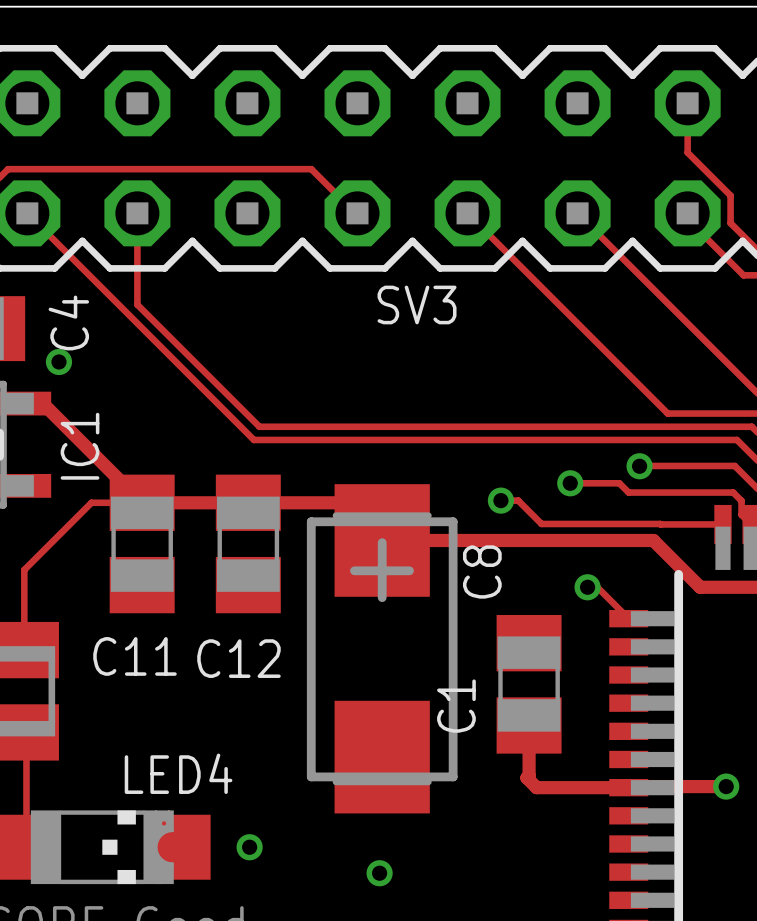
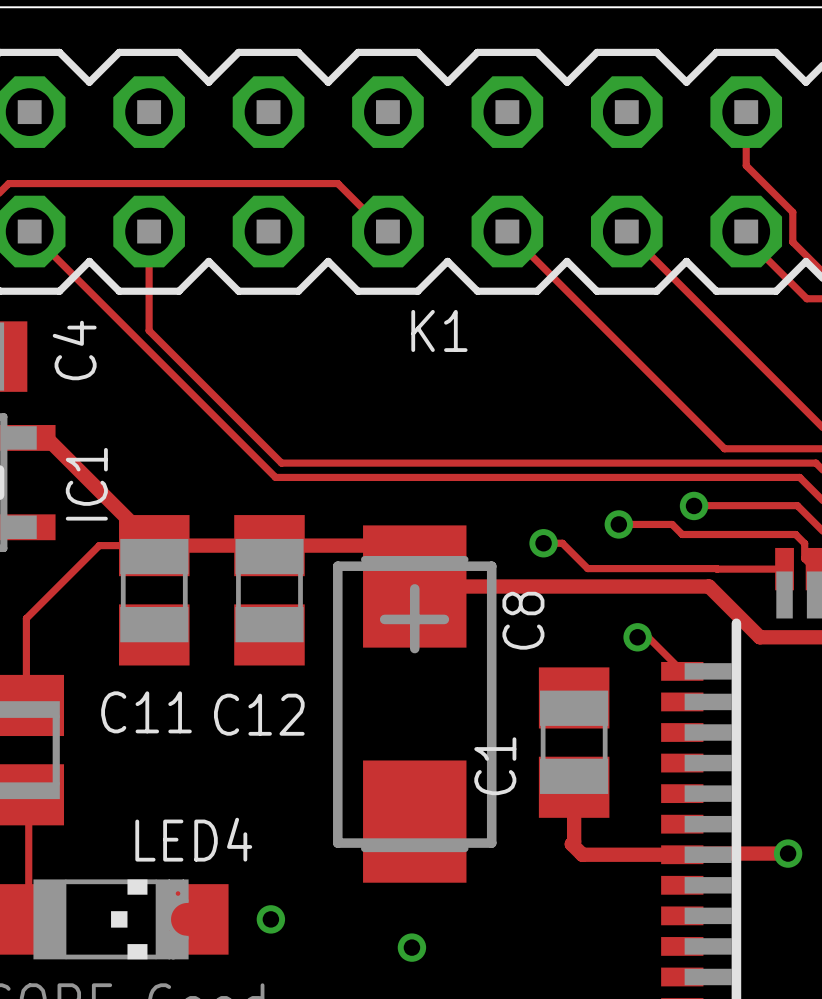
SV3 name: SV3 (417, 304) -> K1 (439, 330)
via: (58, 361) -> none

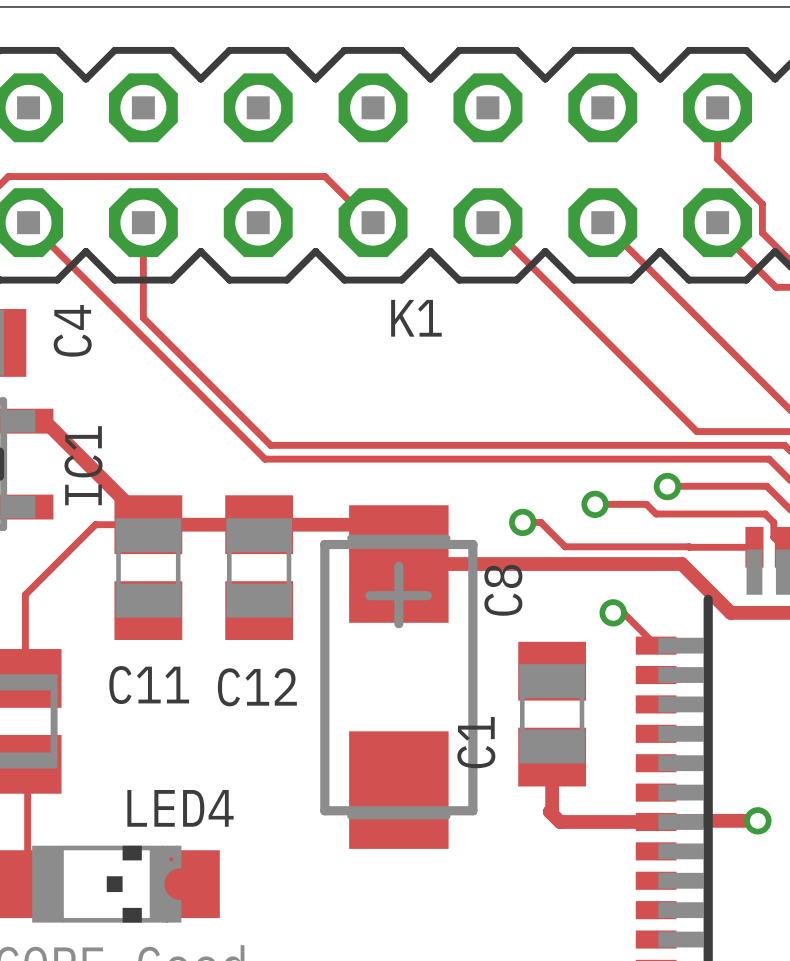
via: (270, 919) -> none
via: (411, 947) -> none

